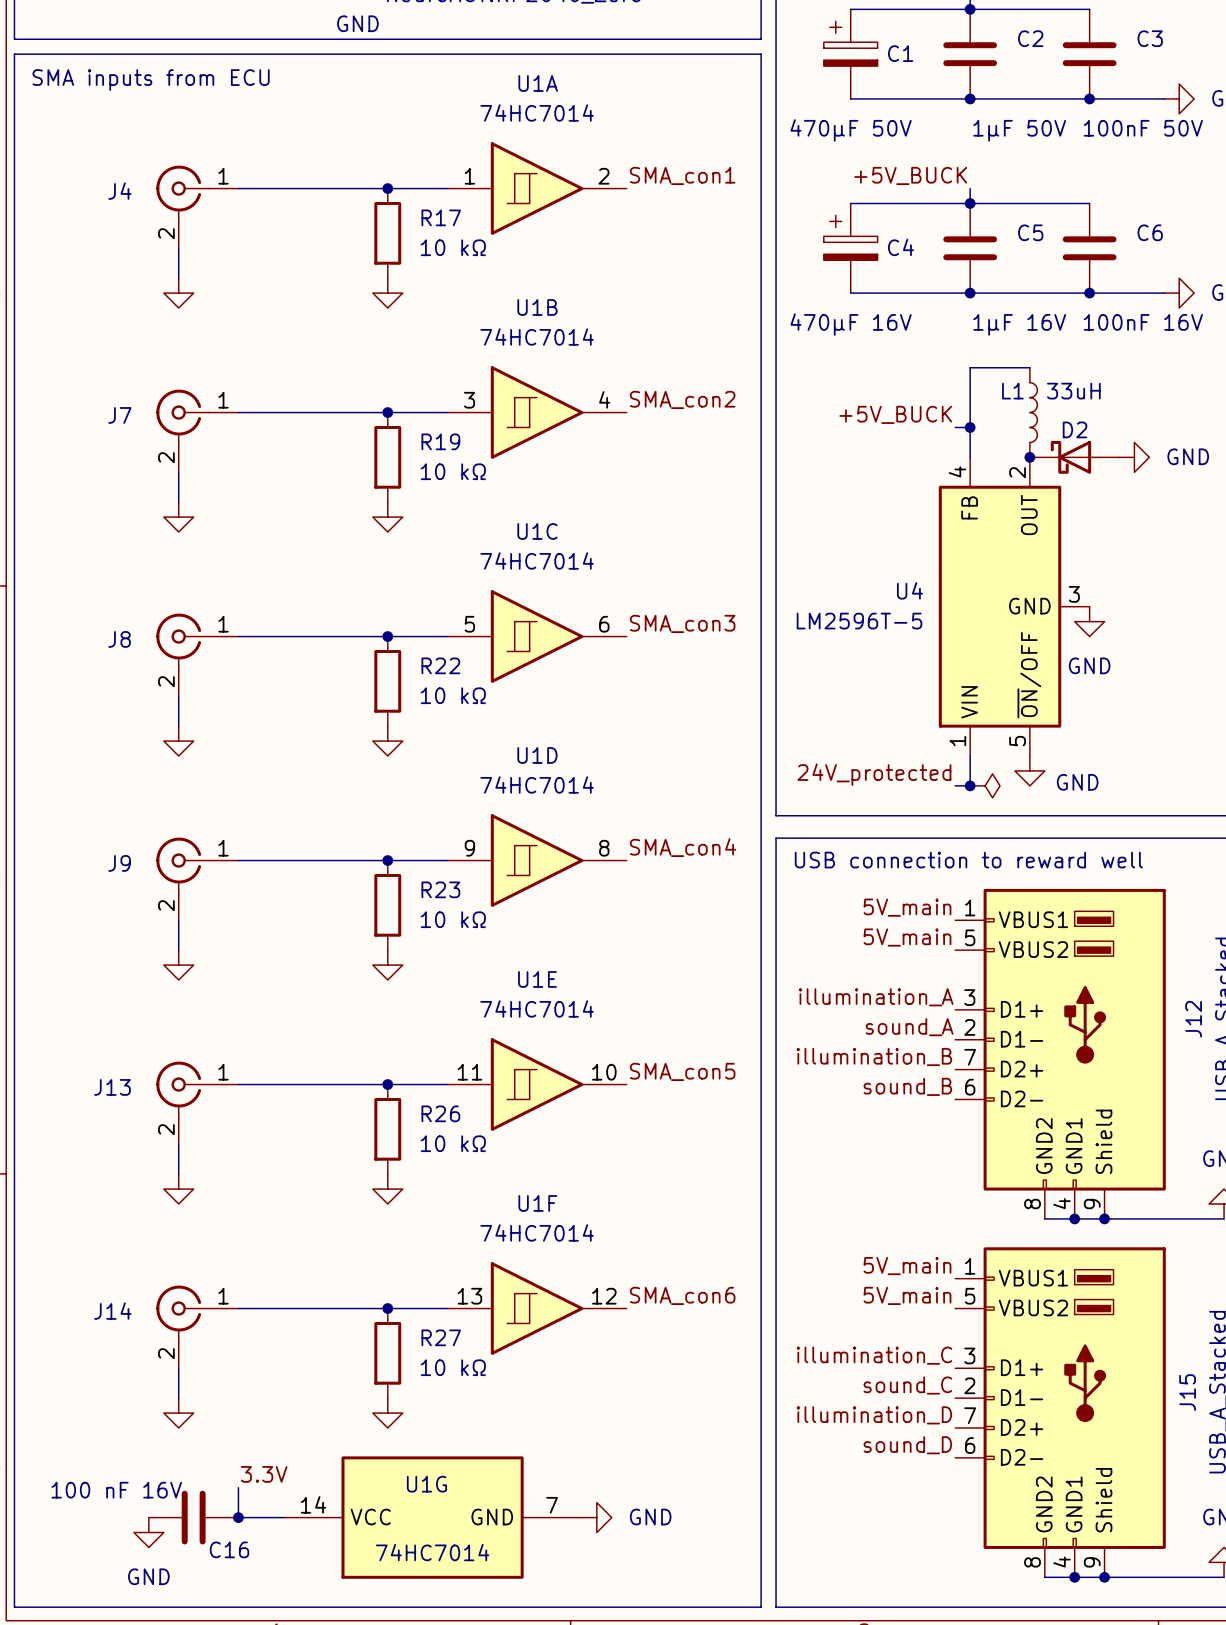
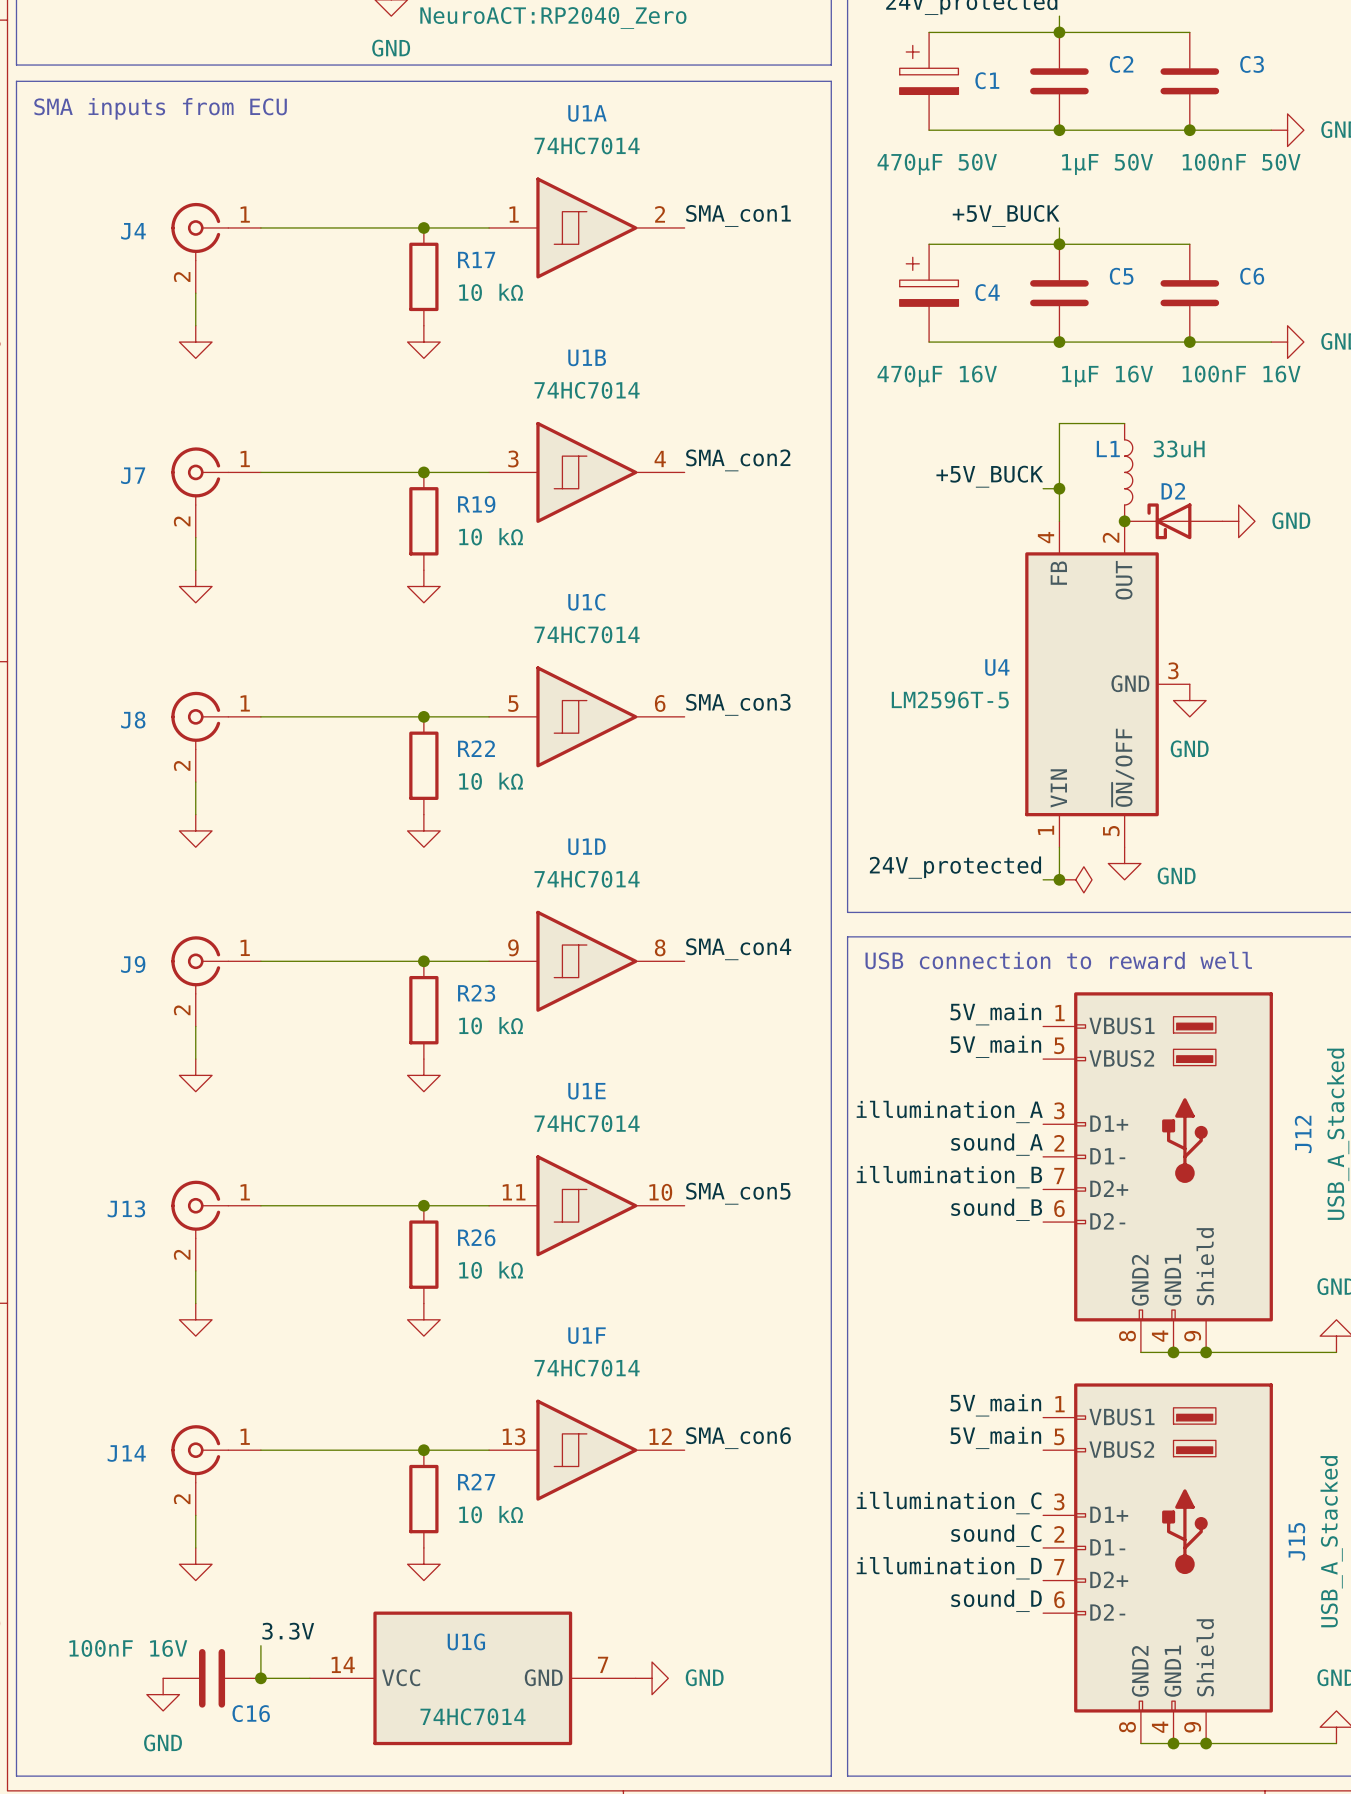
C16 value: 100 nF 16V (116, 1490) -> 100nF 16V (128, 1648)

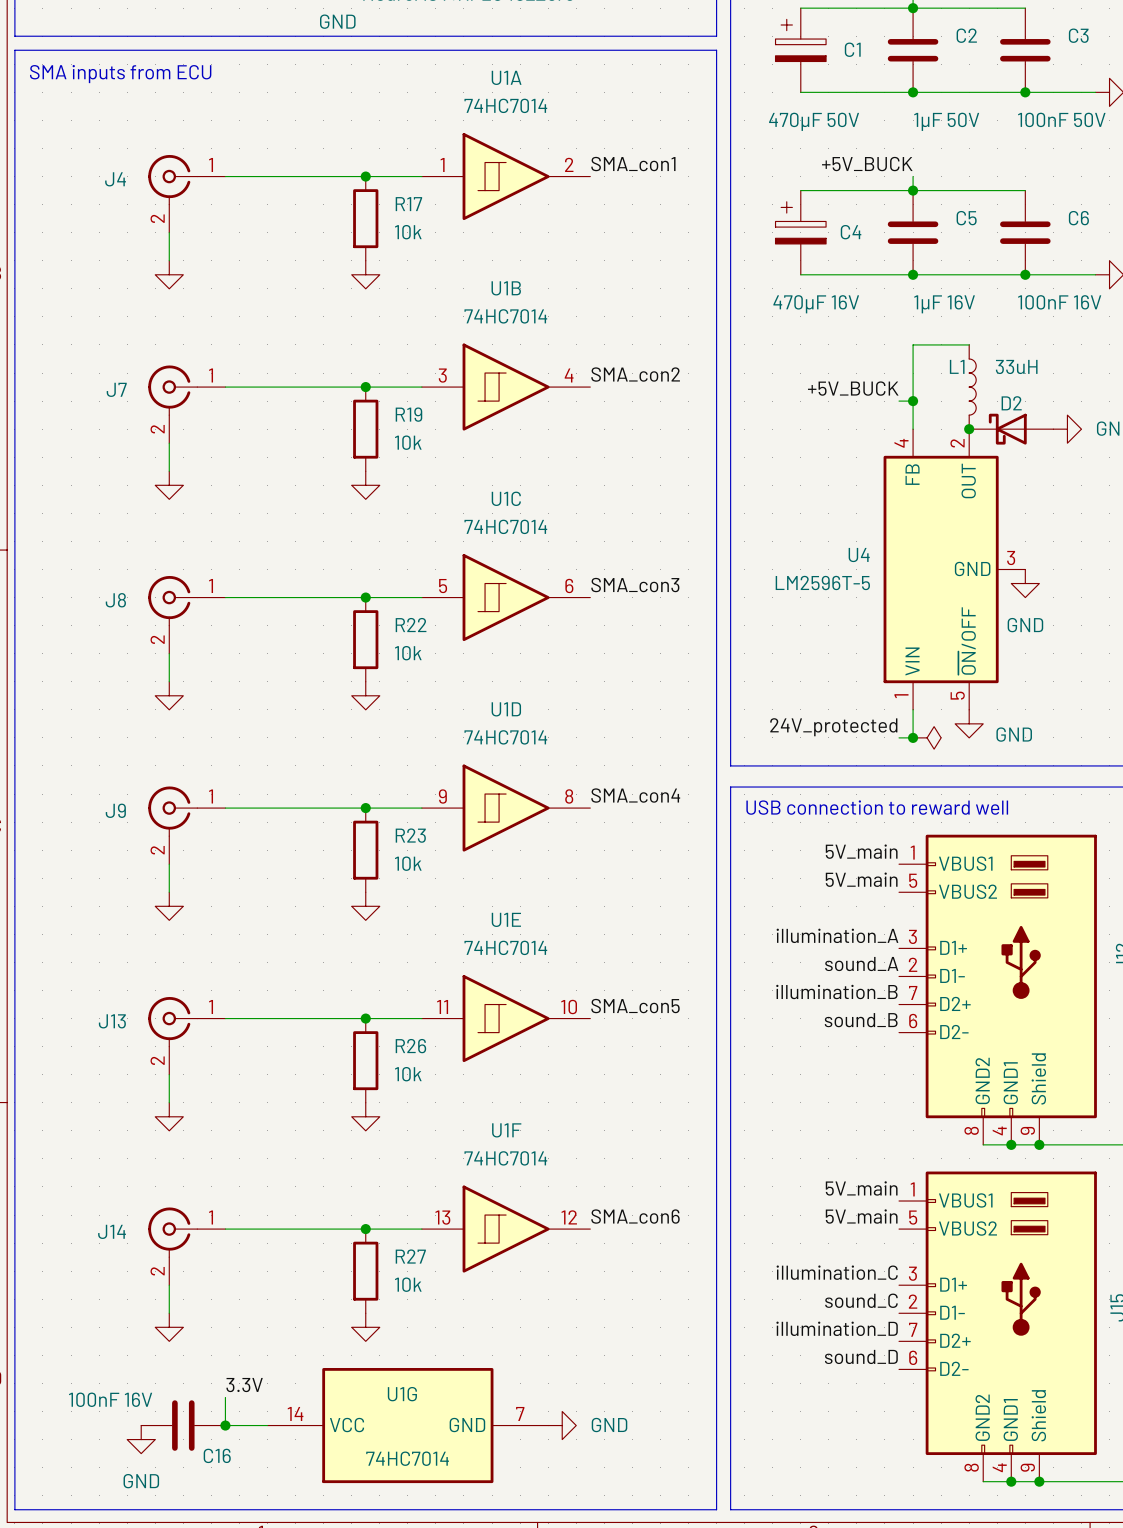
R17 value: 10 kΩ (491, 292) -> 10k (408, 232)
R19 value: 10 kΩ (491, 536) -> 10k (408, 442)
R22 value: 10 kΩ (491, 781) -> 10k (408, 653)
R23 value: 10 kΩ (491, 1025) -> 10k (408, 863)
R26 value: 10 kΩ (491, 1270) -> 10k (408, 1074)
R27 value: 10 kΩ (491, 1514) -> 10k (408, 1284)

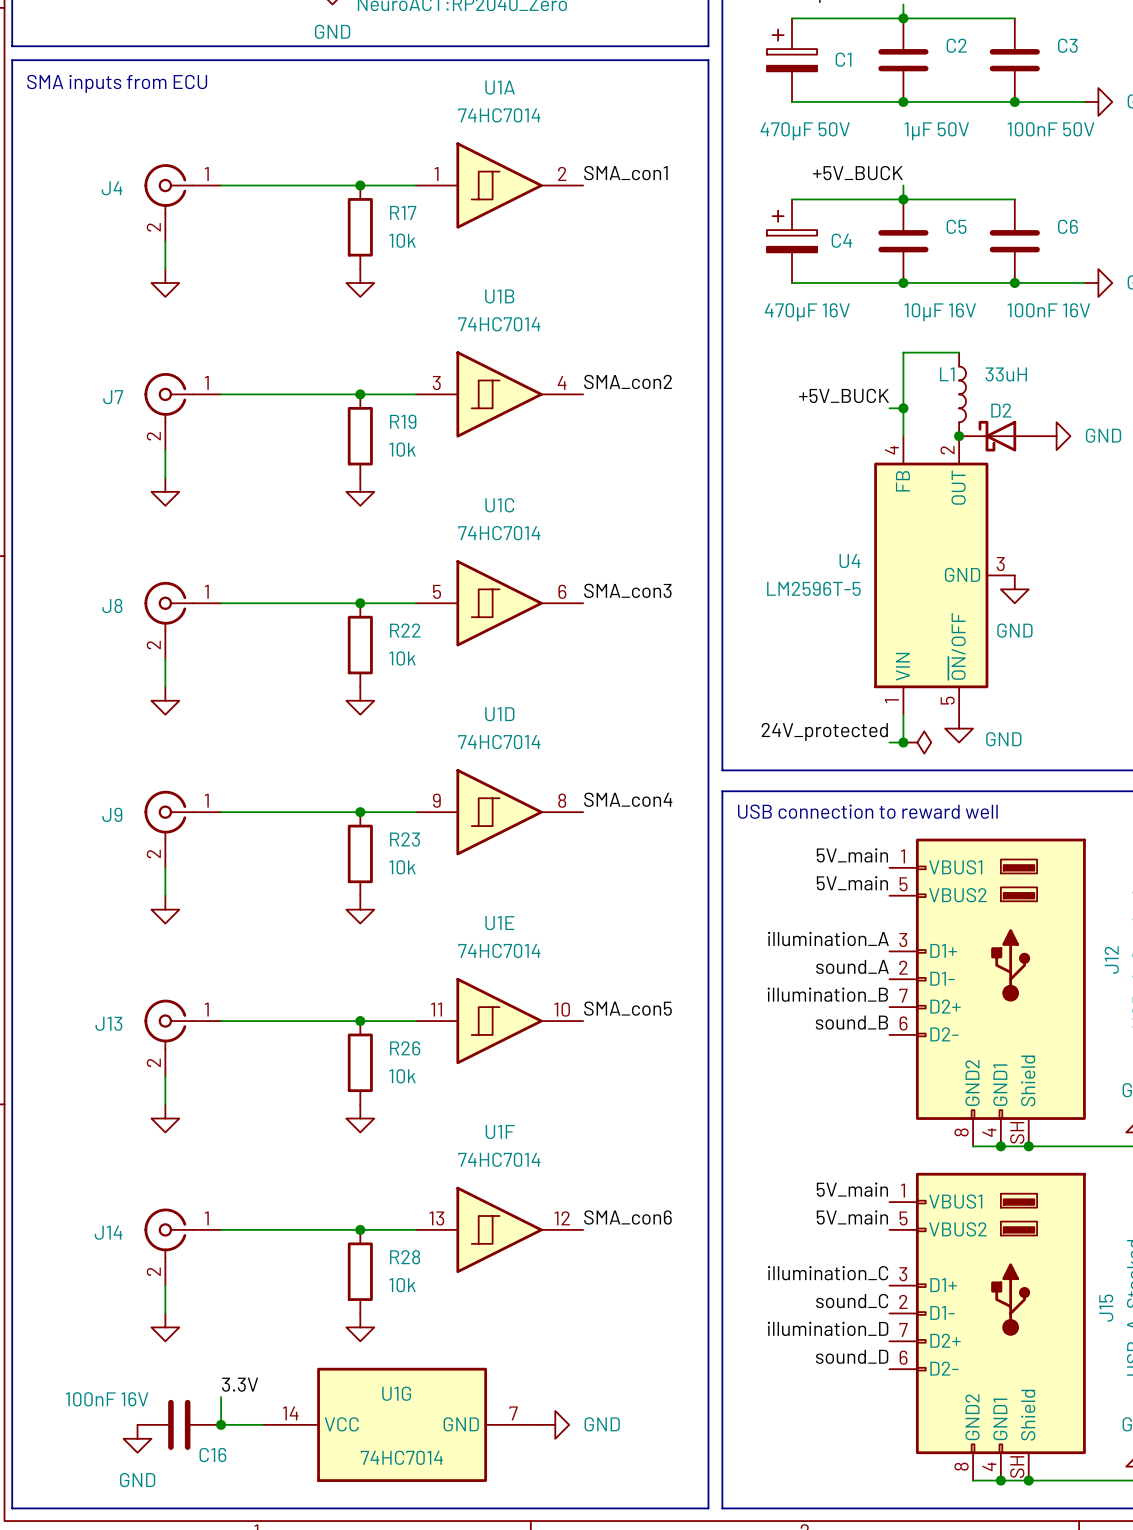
C5 value: 1µF 16V (944, 304) -> 10µF 16V (940, 312)
J12 pin number: 9 (1027, 1130) -> SH (1017, 1132)
R27 name: R27 (410, 1256) -> R28 (405, 1257)
J15 pin number: 9 (1027, 1467) -> SH (1017, 1467)

